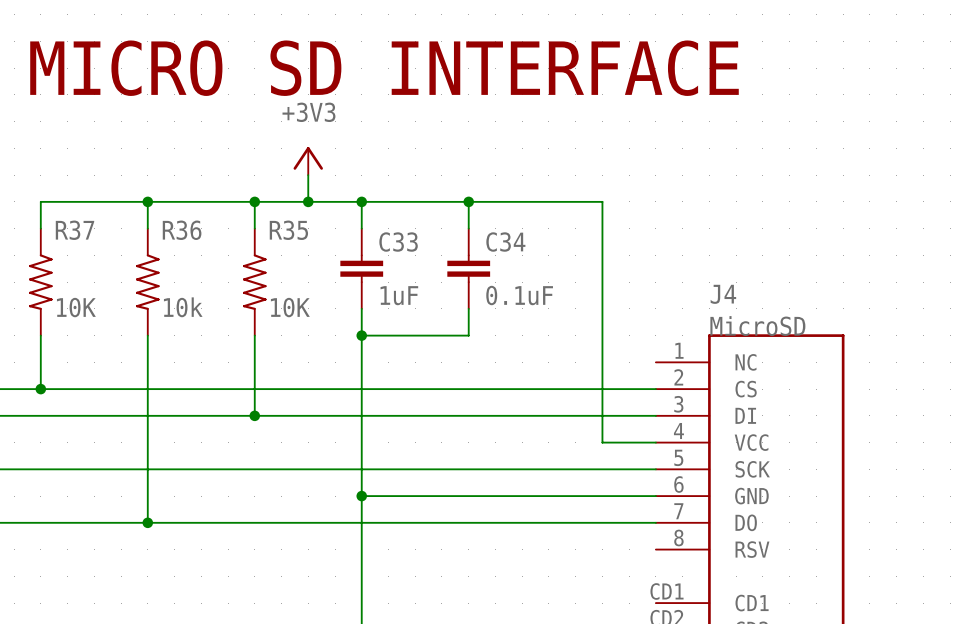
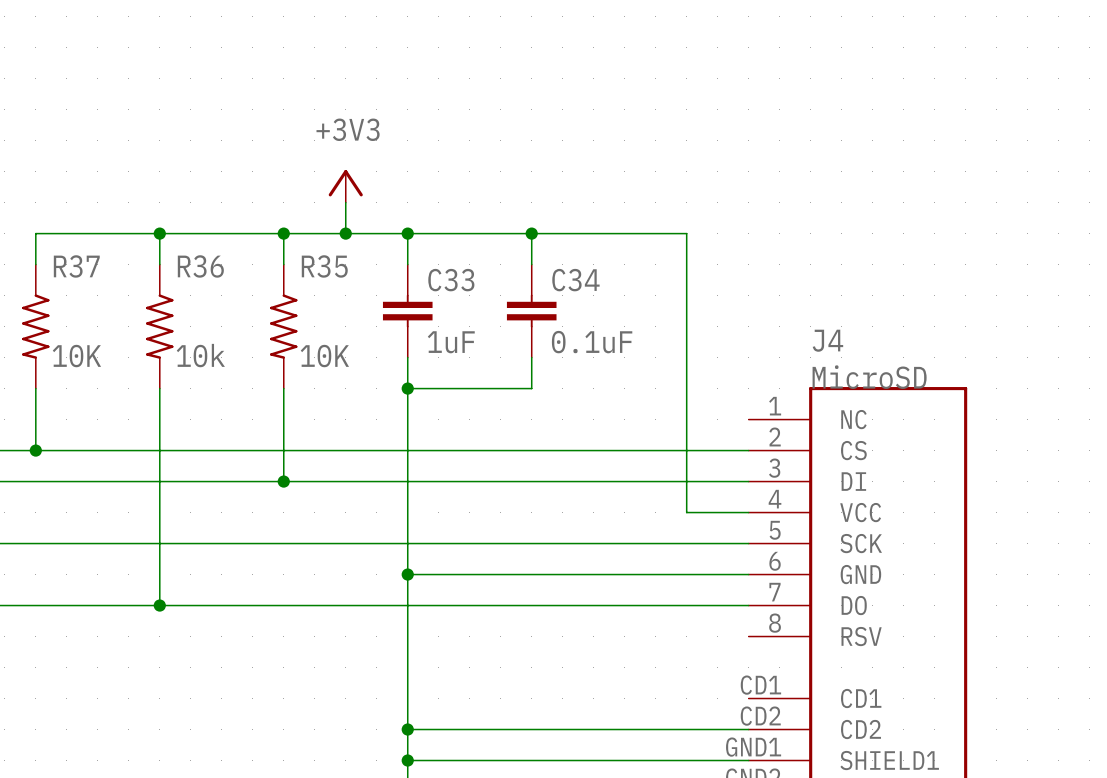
text: MICRO SD INTERFACE (384, 68) -> none

